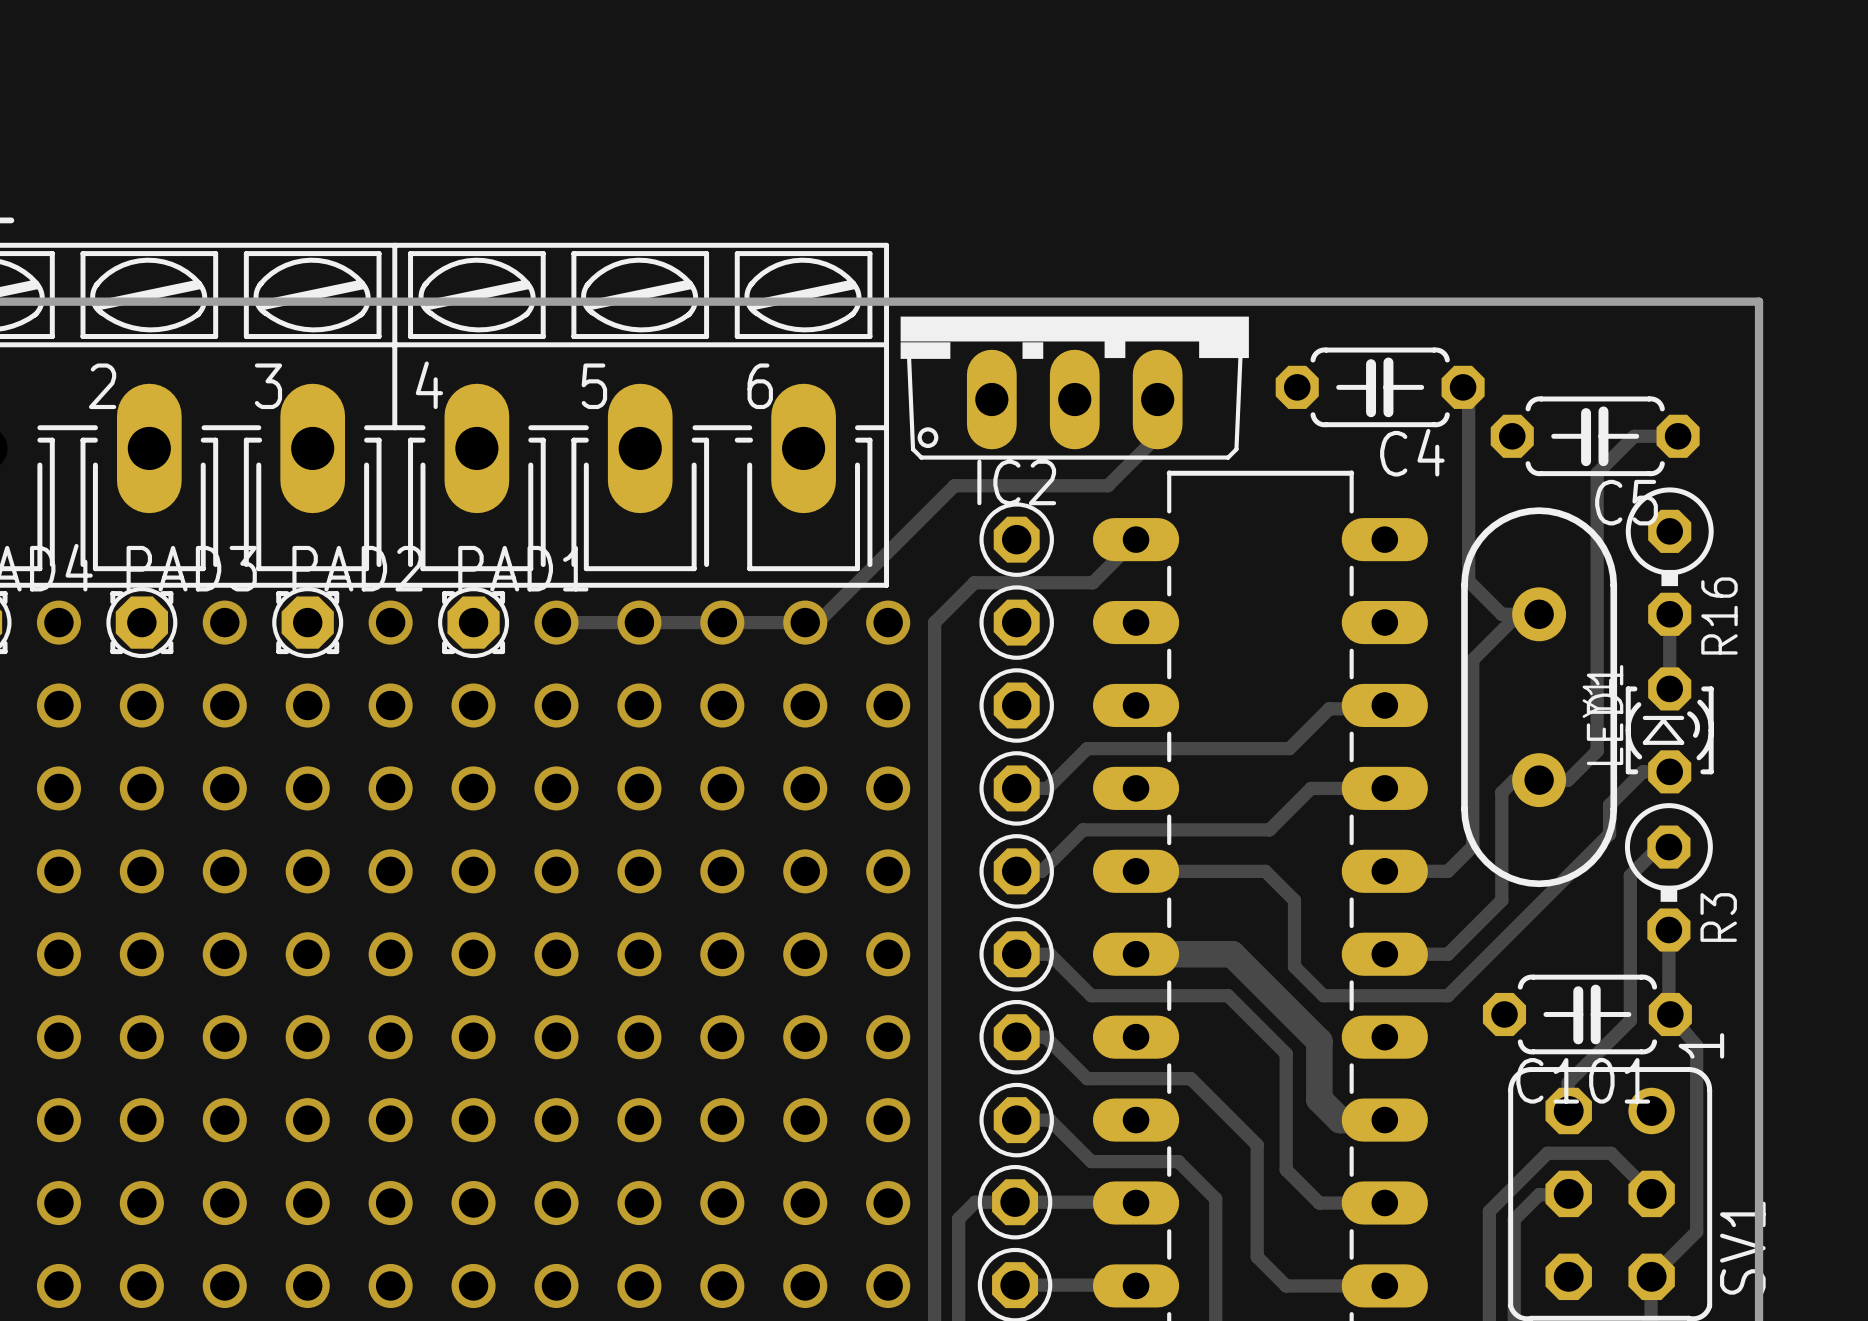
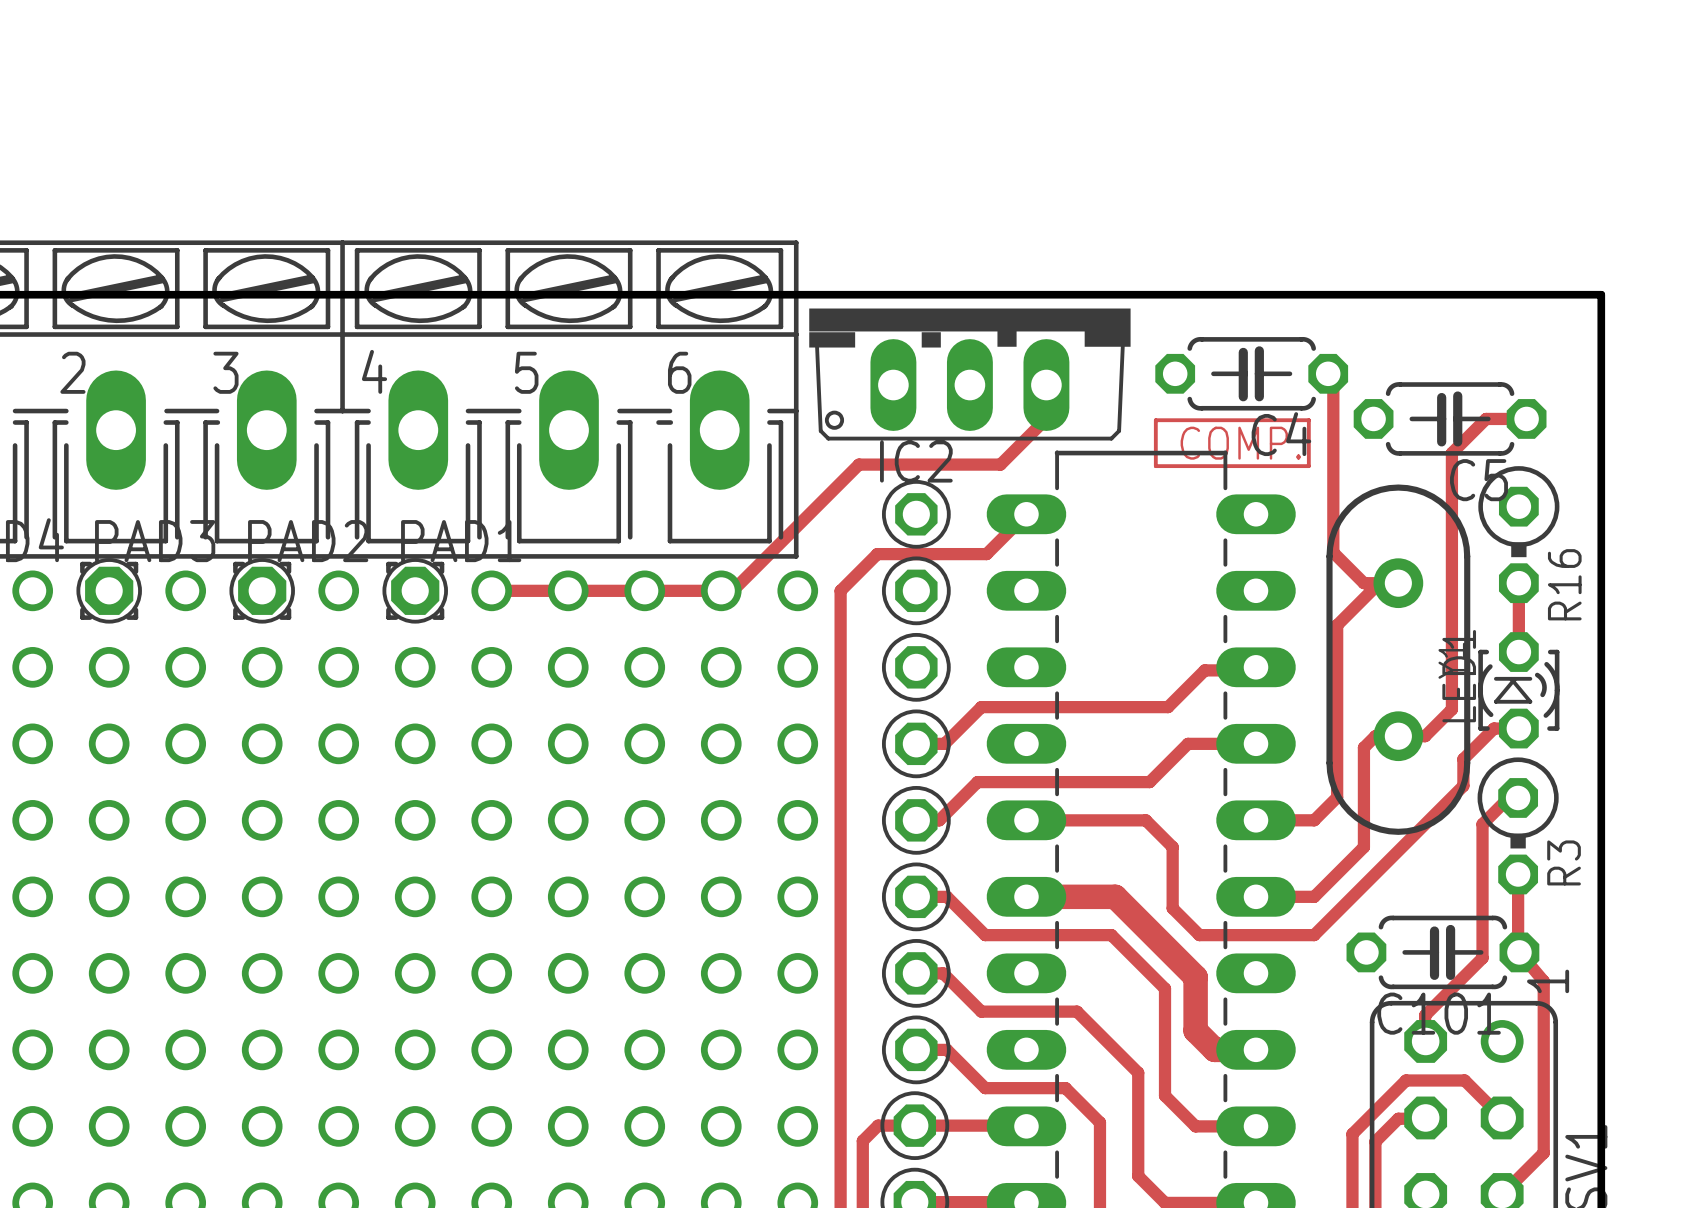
drawing: none -> [1153, 418, 1311, 469]

